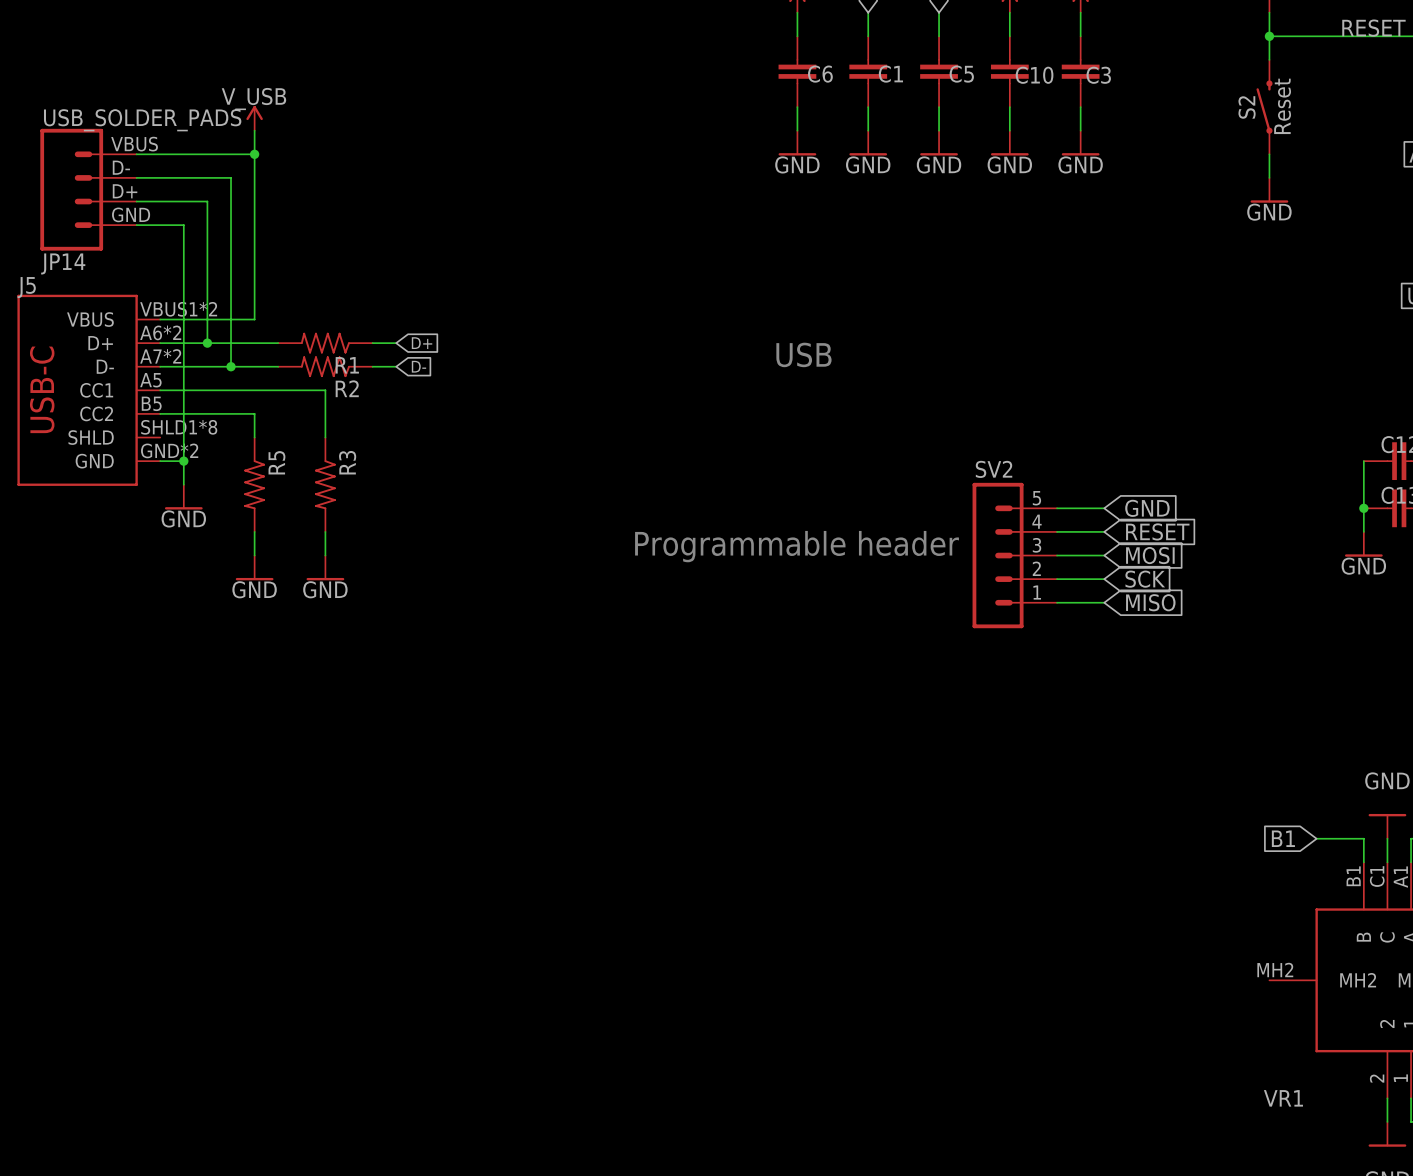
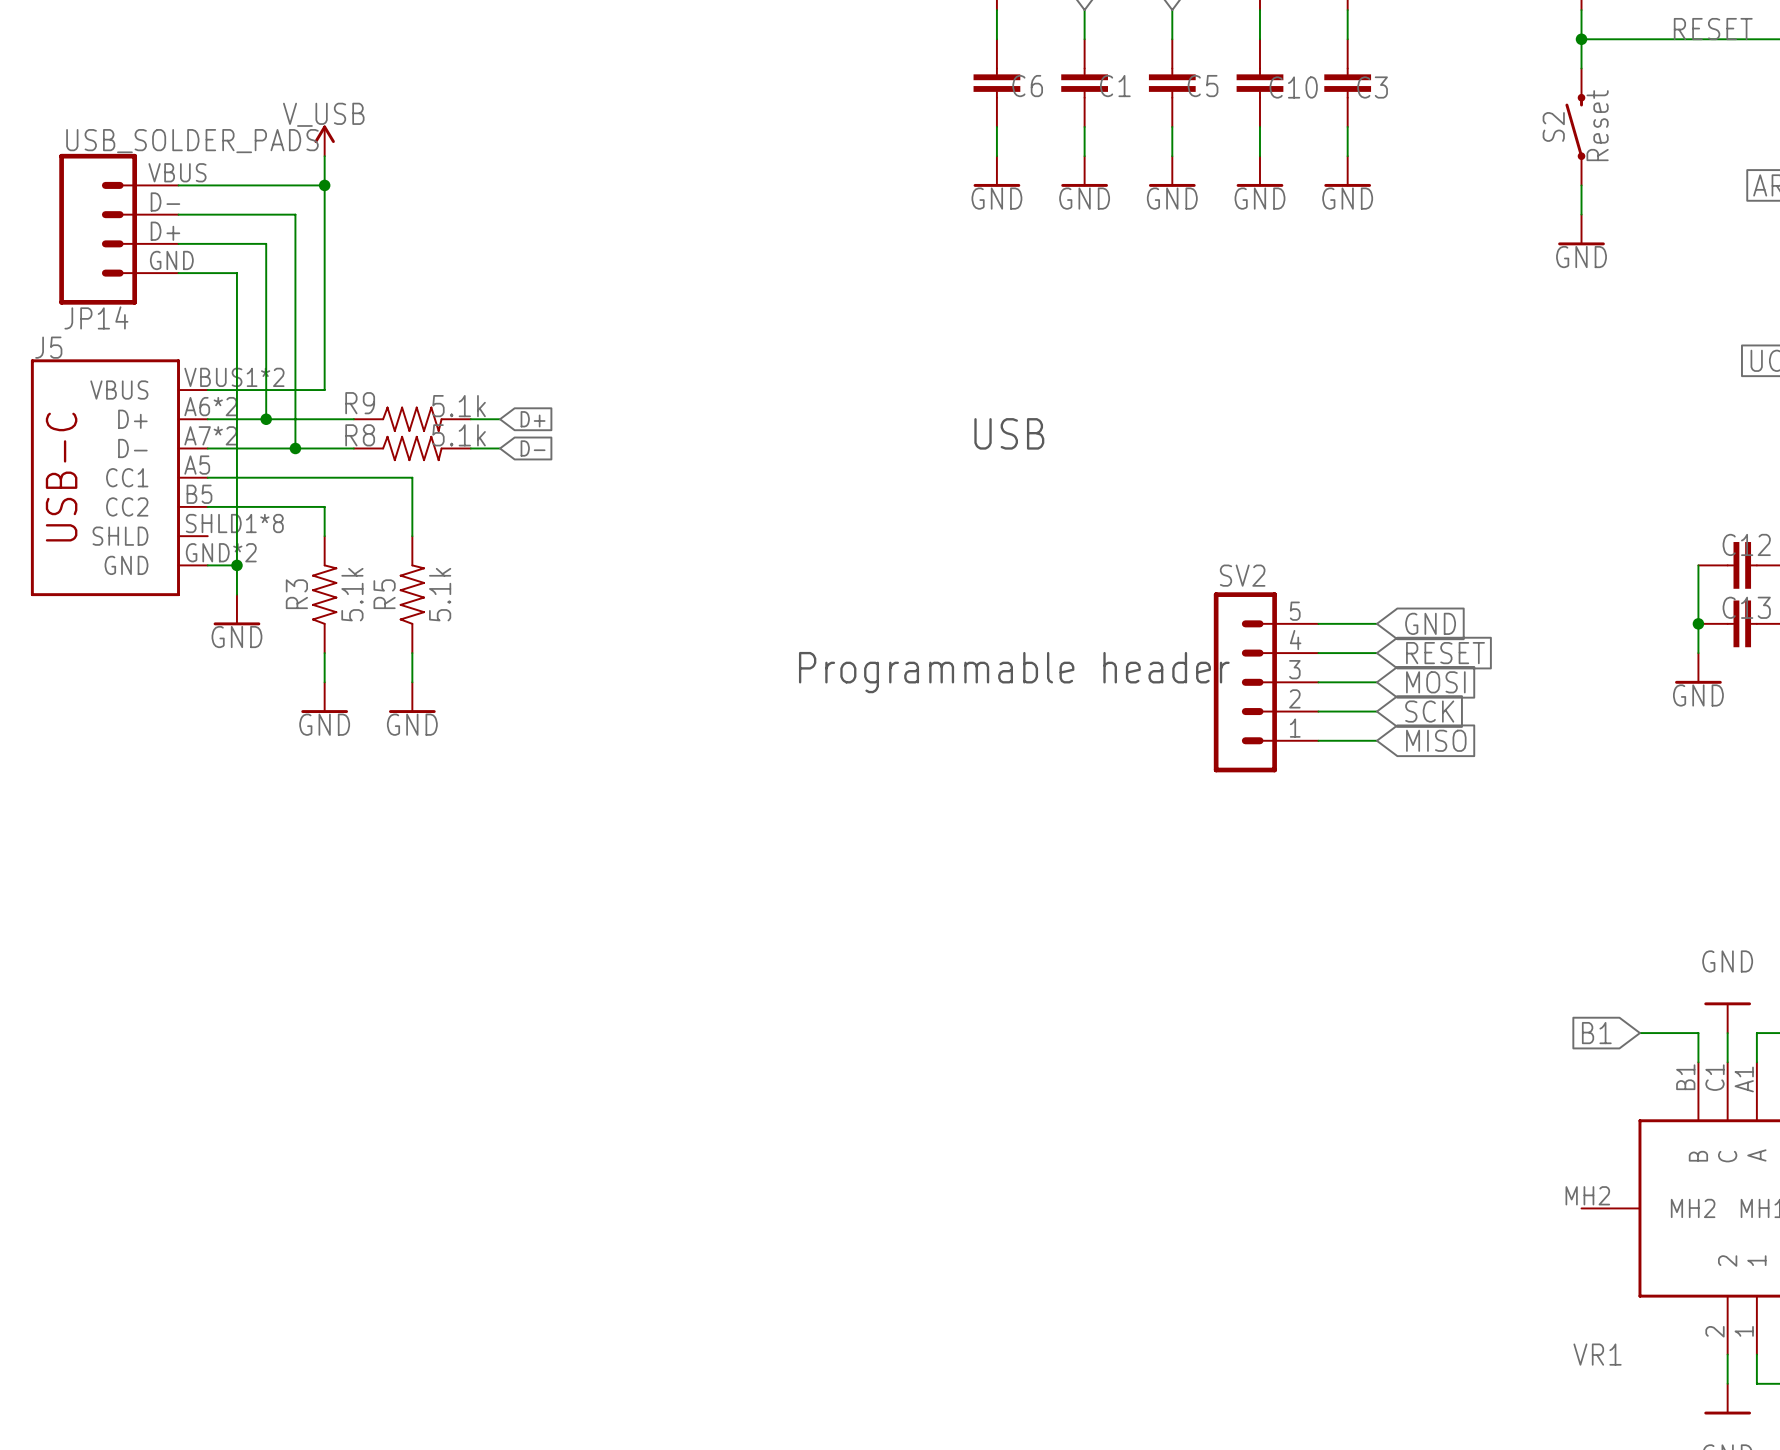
R1: (325, 343) -> none
R9: none -> 5.1k (412, 419)
R2: (325, 366) -> none
R8: none -> 5.1k (412, 448)
R5 symbol: [244, 437, 265, 532] -> [399, 536, 425, 654]
R3 symbol: [315, 437, 336, 532] -> [312, 536, 338, 654]
R5 name position: R5 (276, 462) -> R5 (384, 594)
R3 name position: R3 (347, 462) -> R3 (296, 594)
R3 value: none -> 5.1k (352, 594)
R5 value: none -> 5.1k (440, 594)

